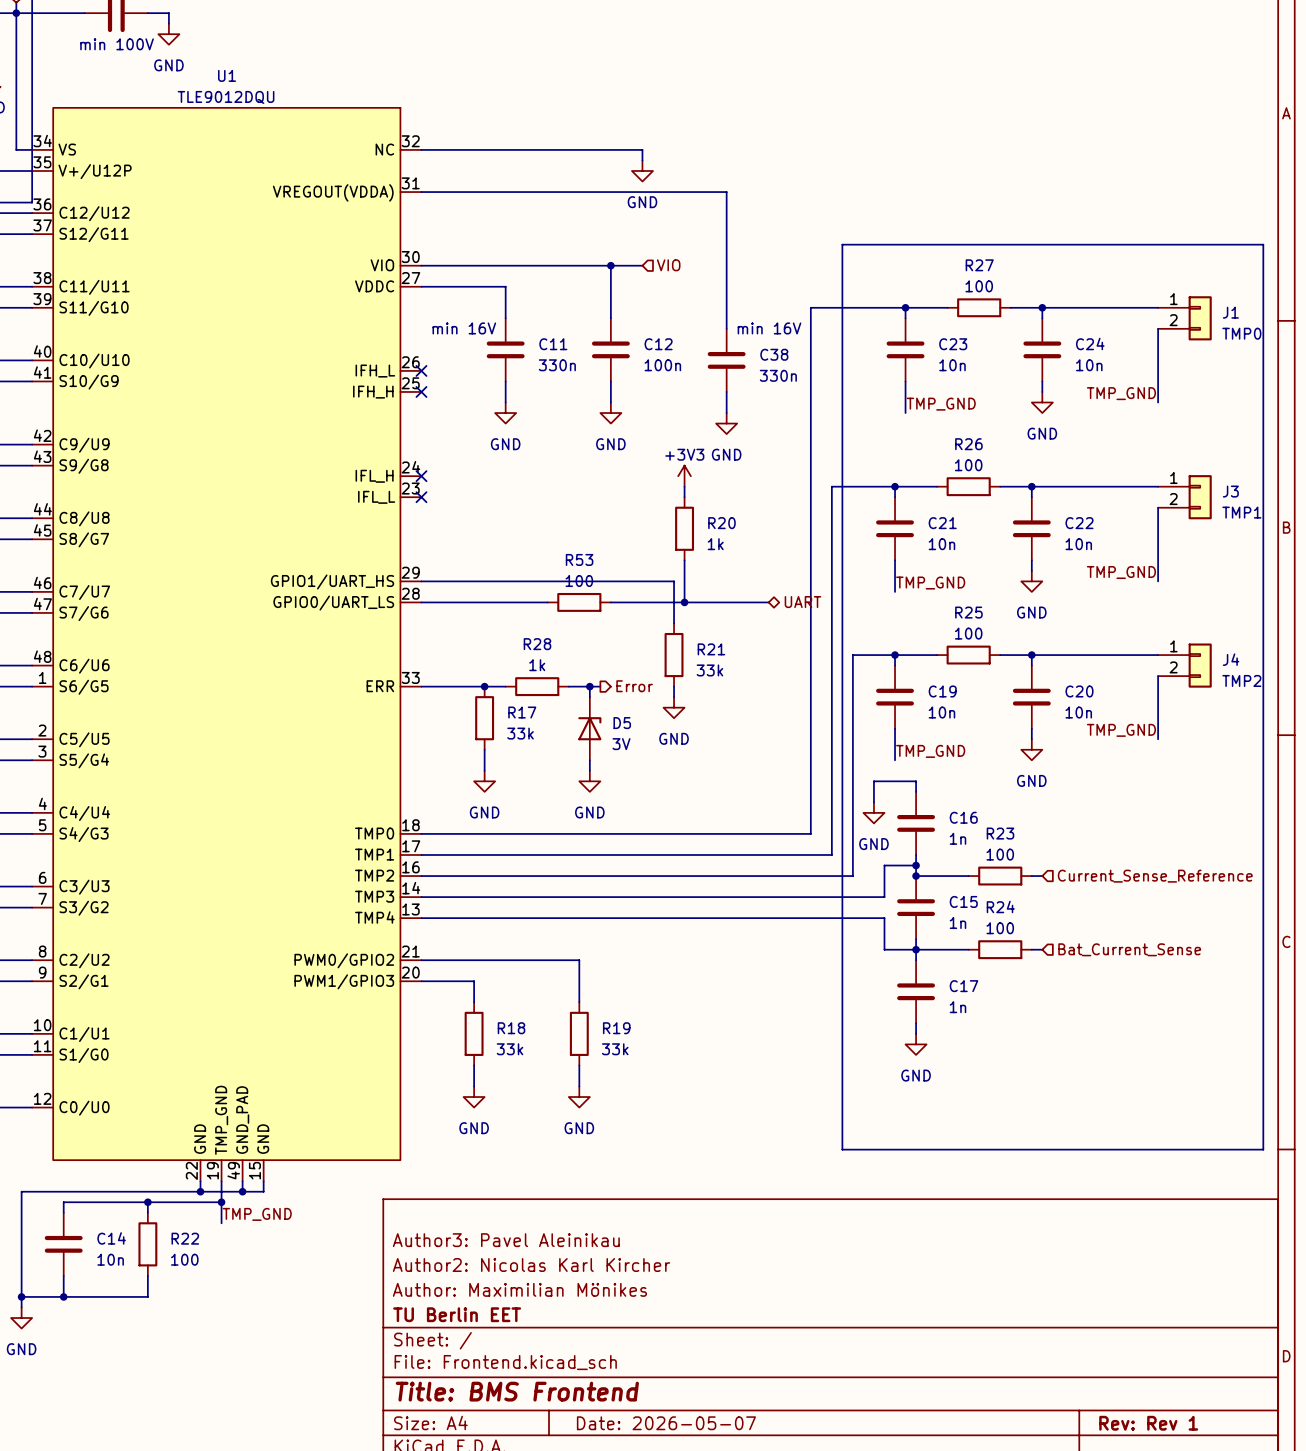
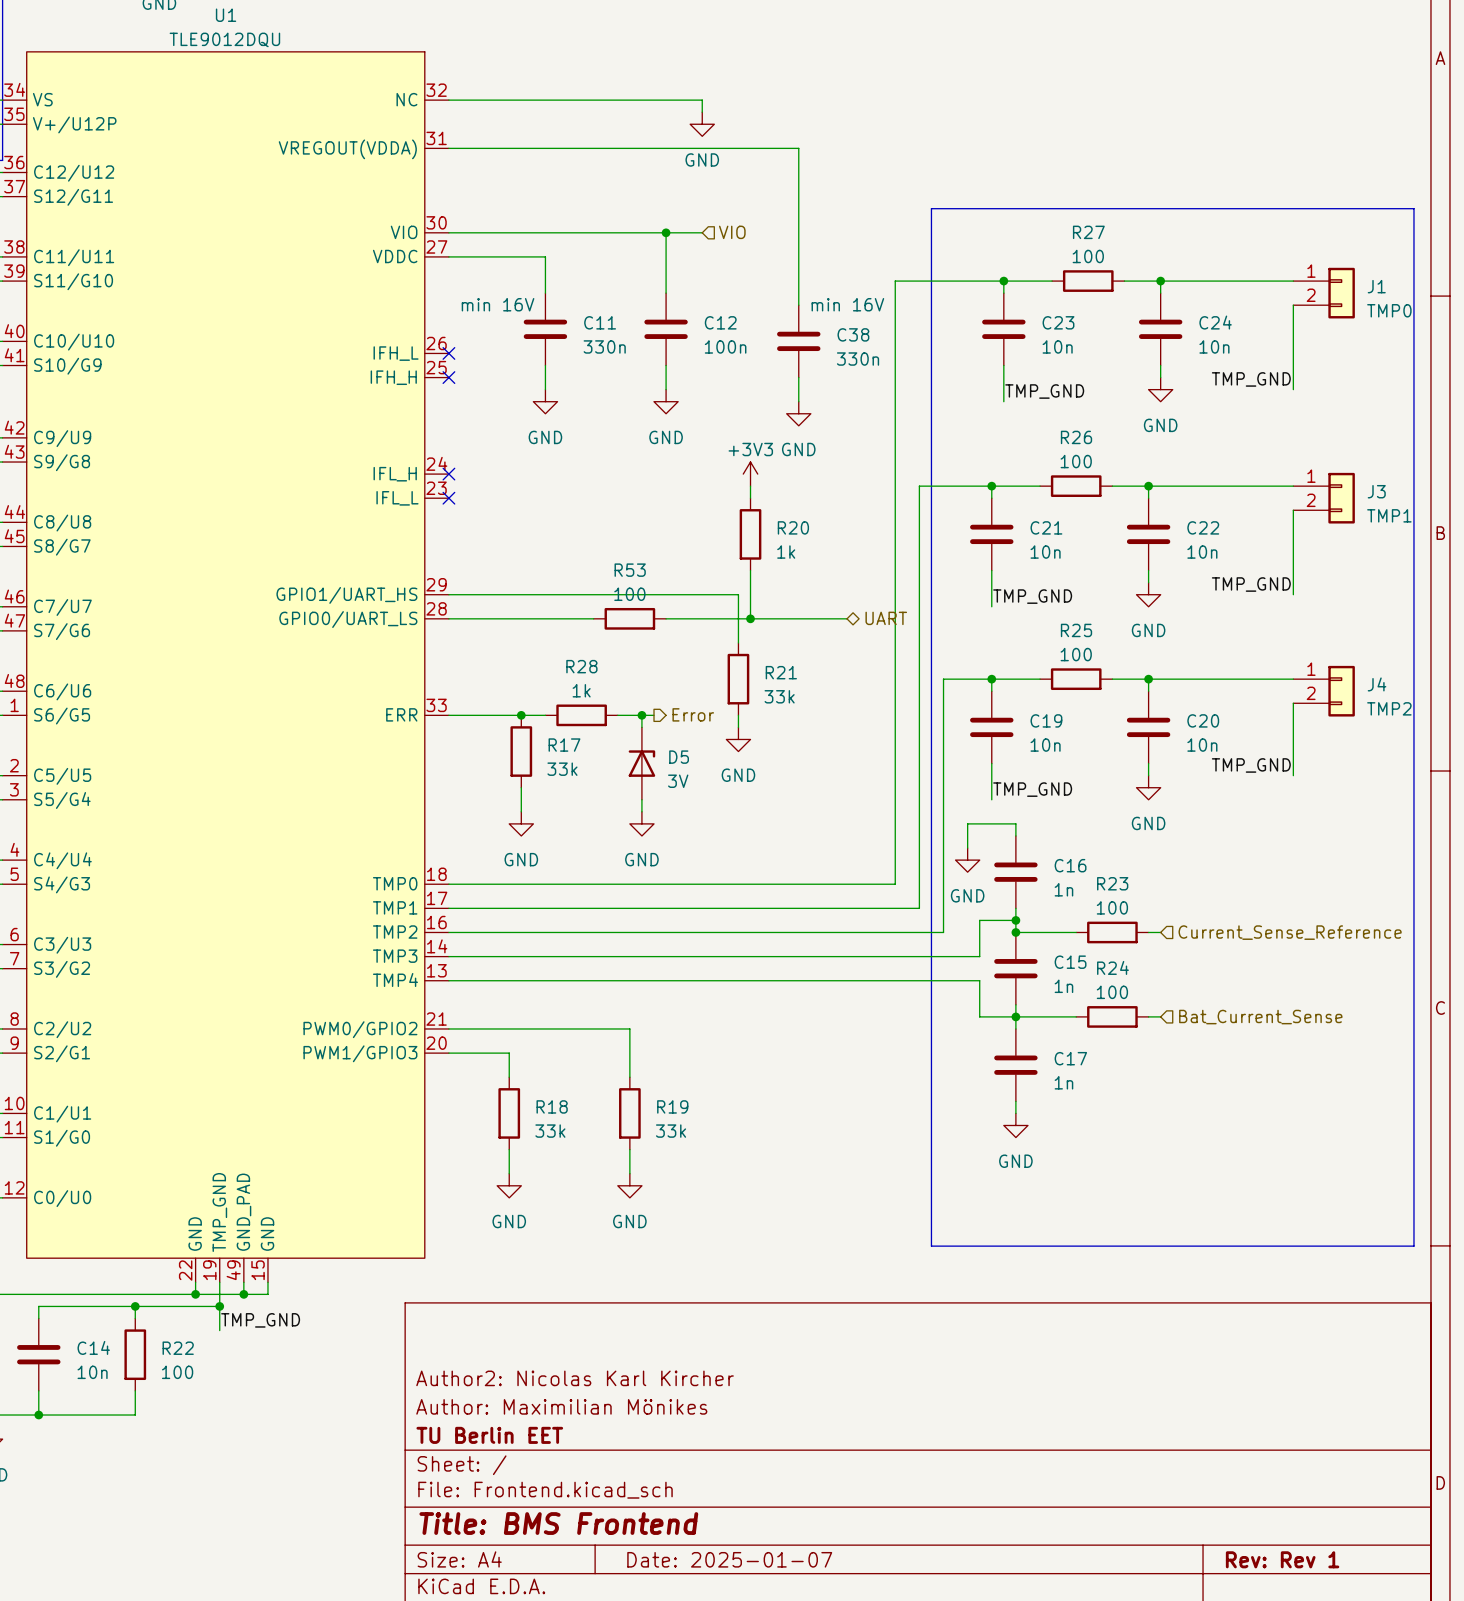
title block: Author3: Pavel Aleinikau (506, 1240) -> none
title block: Date: 2026-05-07 (666, 1423) -> Date: 2025-01-07 (729, 1559)

